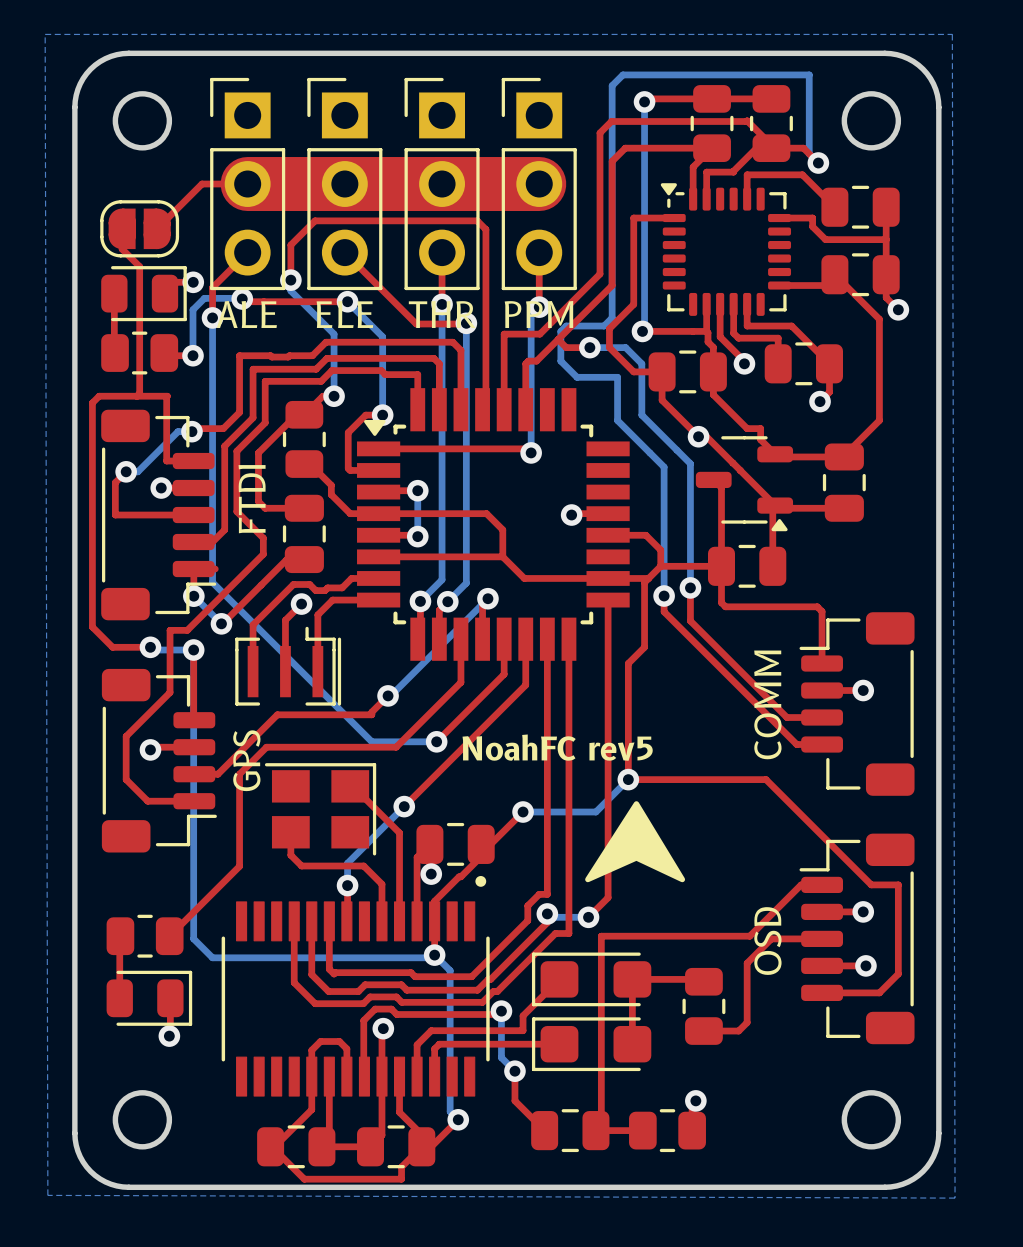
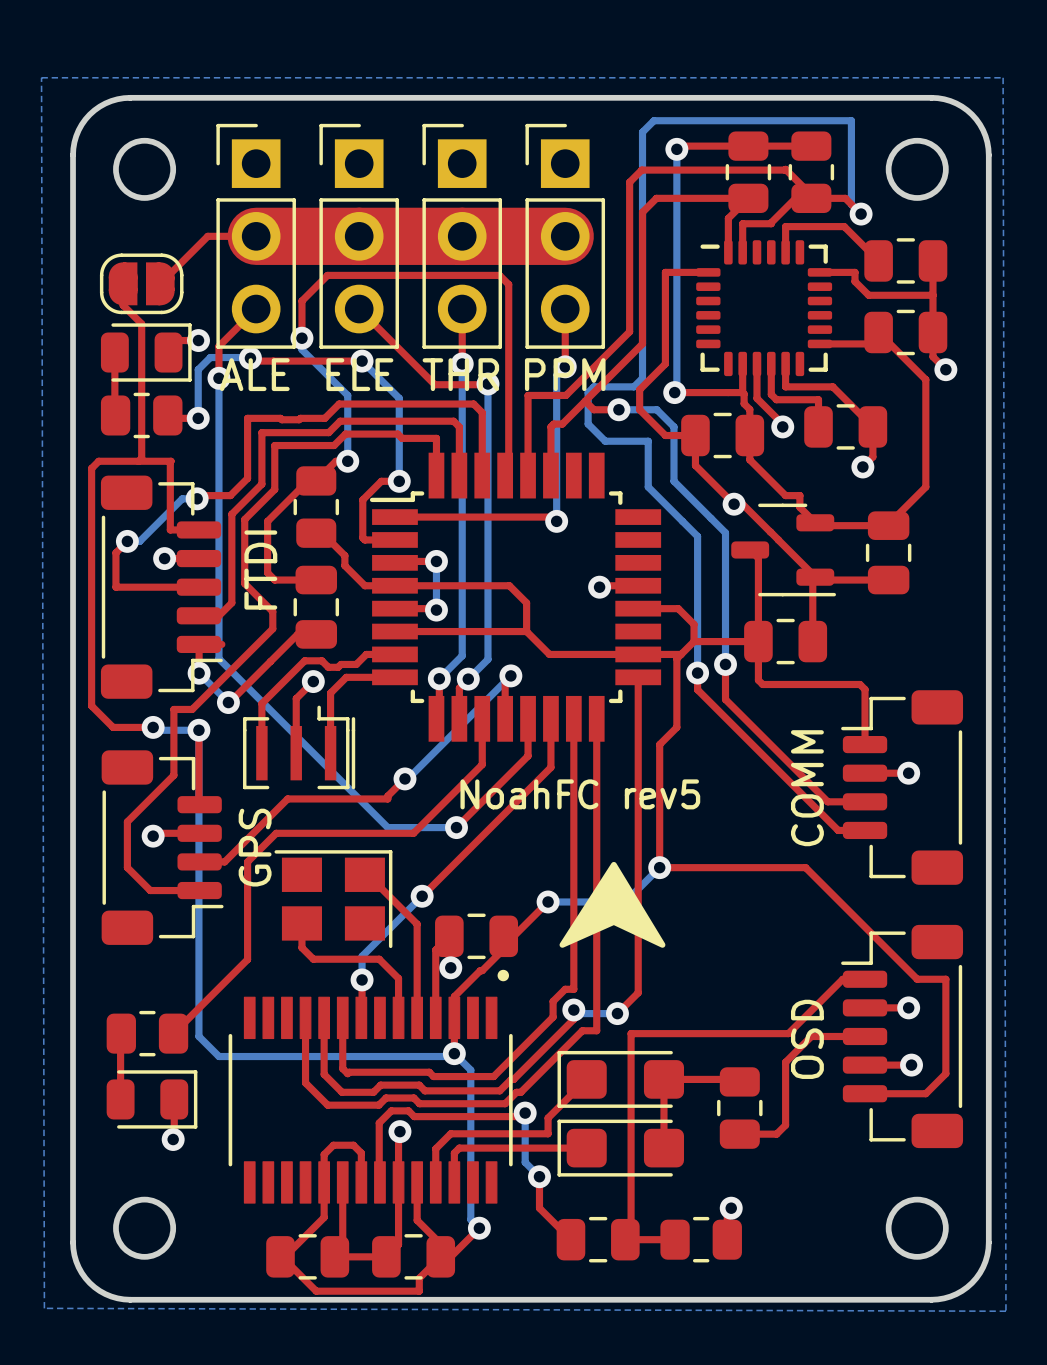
part footprint: [660, 183, 792, 316] -> [696, 240, 833, 377]
part footprint: [357, 388, 630, 661] -> [369, 452, 662, 742]
part footprint: [695, 436, 794, 532] -> [731, 503, 836, 597]
text position: NoahFC rev5 (557, 747) -> NoahFC rev5 (580, 794)
drawing position: (635, 841) -> (612, 904)

